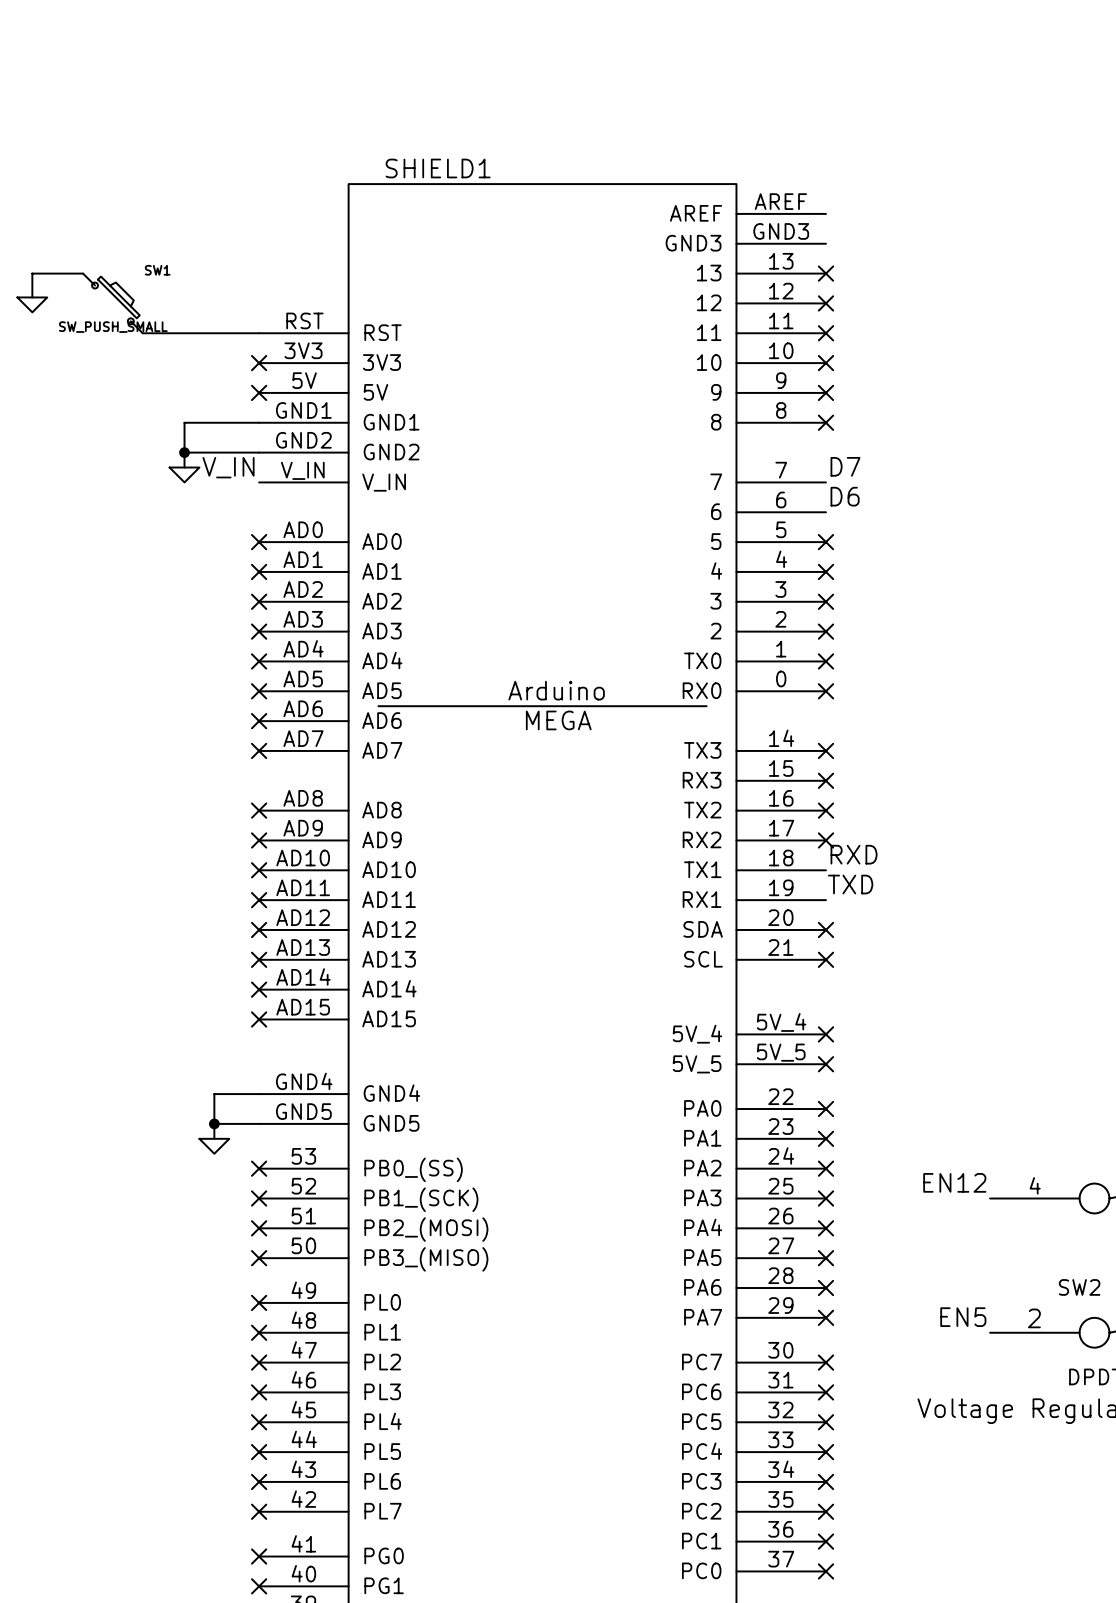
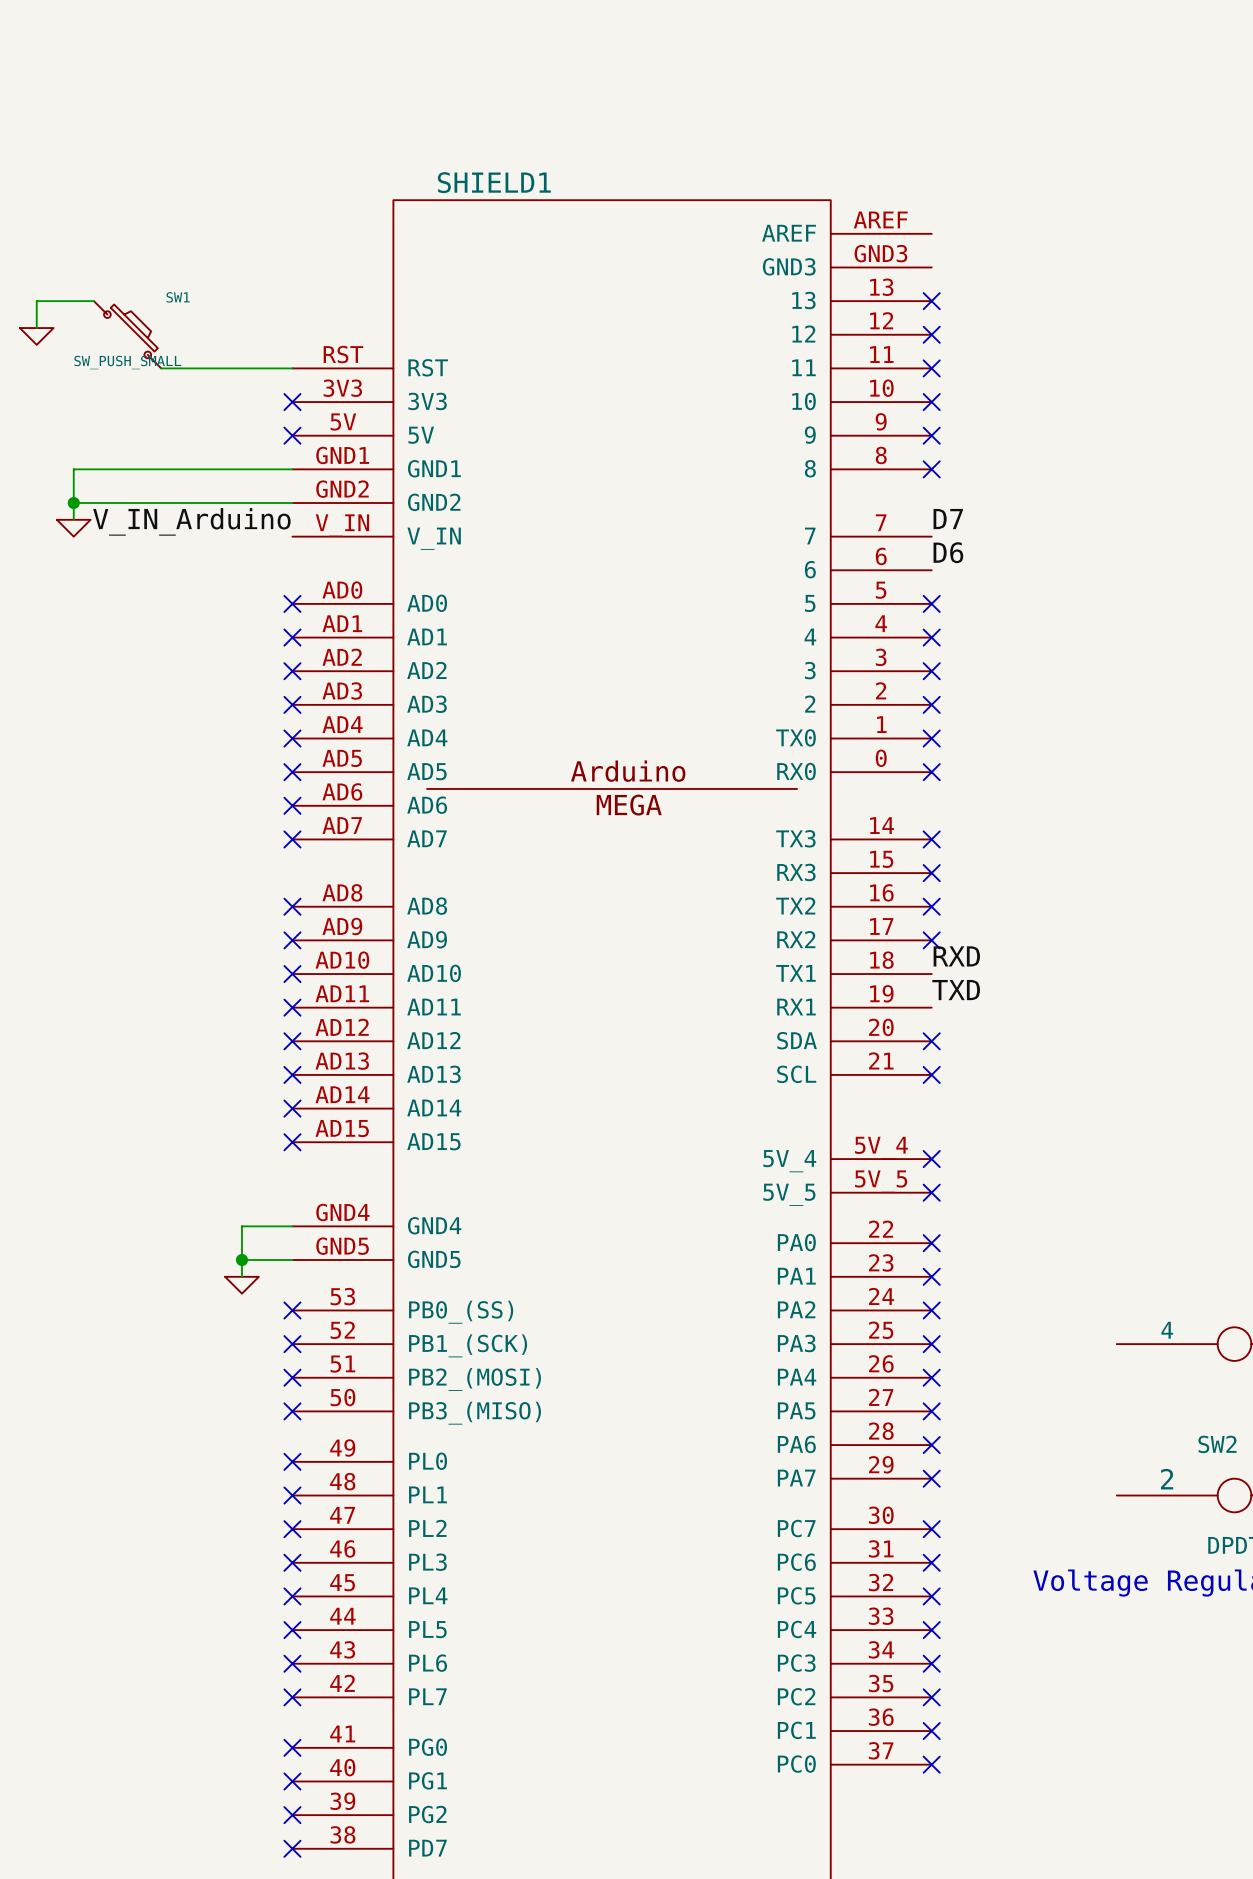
wire: (184, 422) (184, 467) -> (208, 469) (73, 469) (73, 519)
wire: none -> (73, 502) (208, 502)
junction: none -> (73, 502)
junction: (184, 452) -> none
label: V_IN (228, 467) -> V_IN_Arduino (191, 521)
power symbol position: (184, 474) -> (73, 528)
label: EN12 (954, 1182) -> none
label: EN5 (963, 1317) -> none

